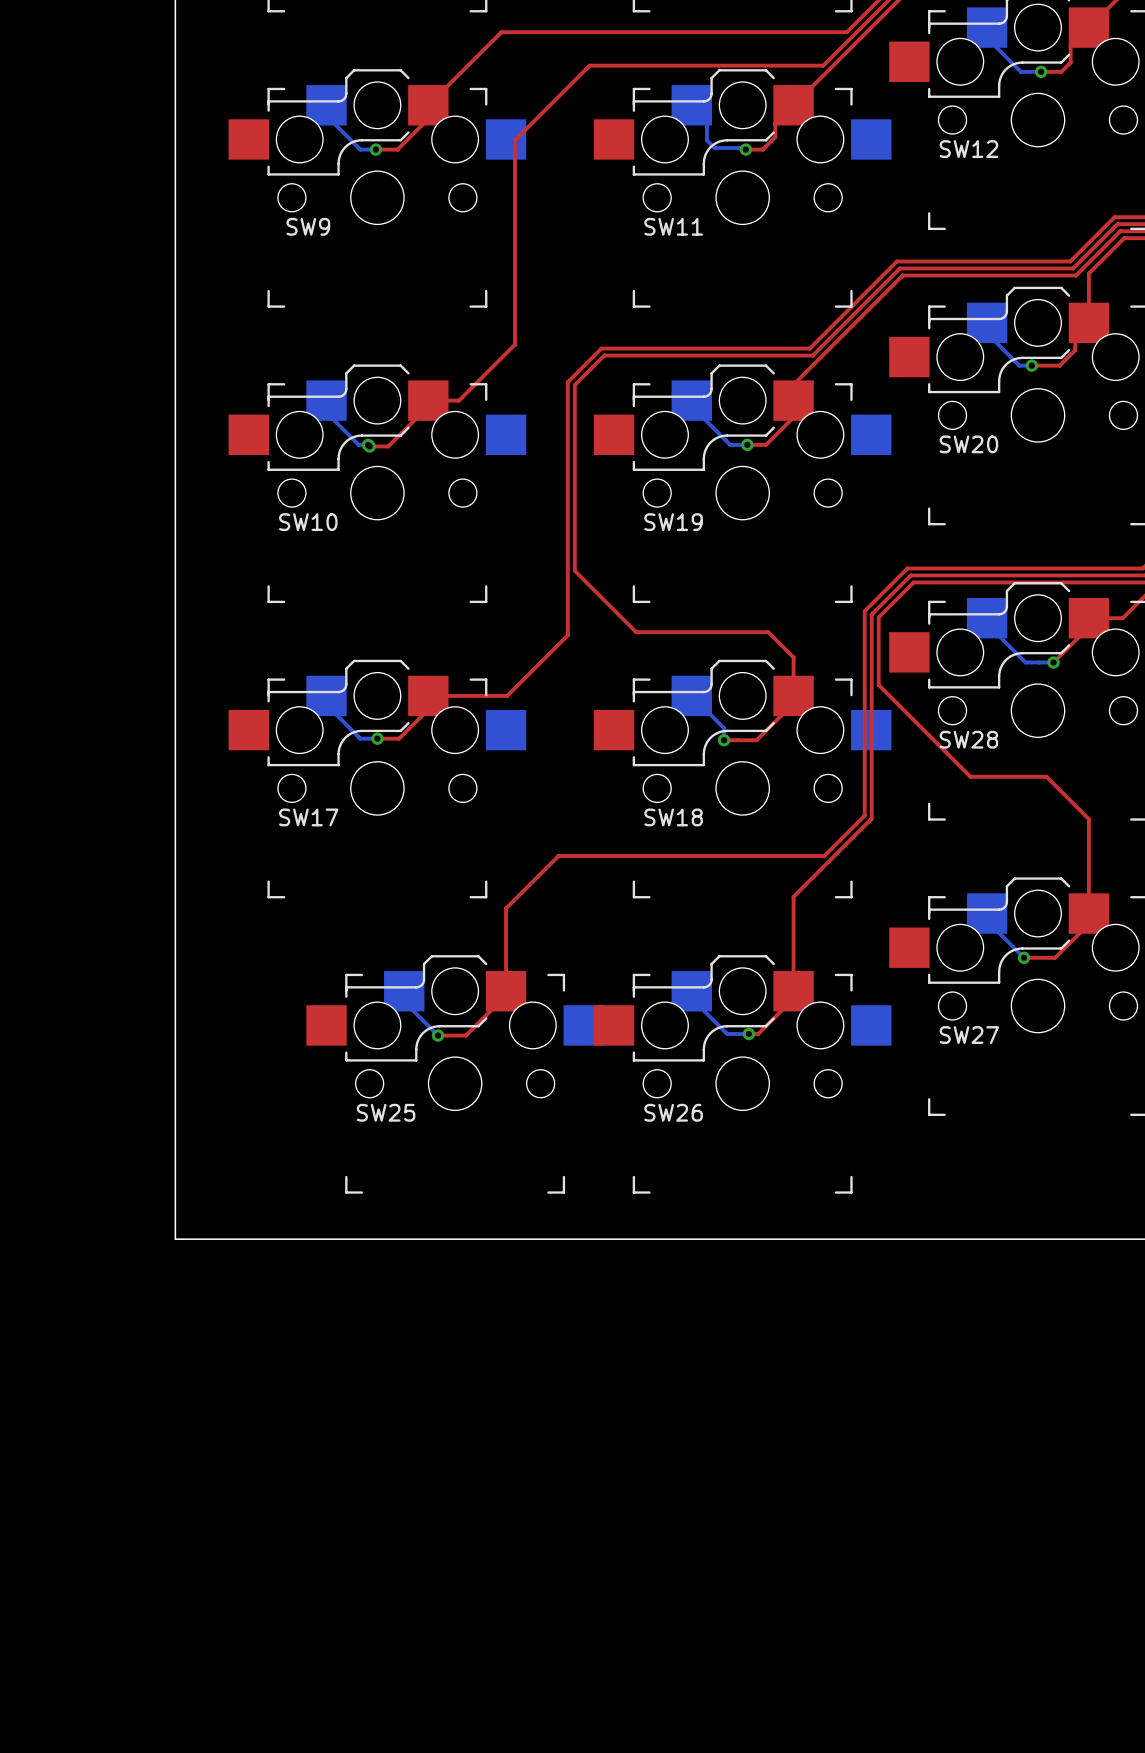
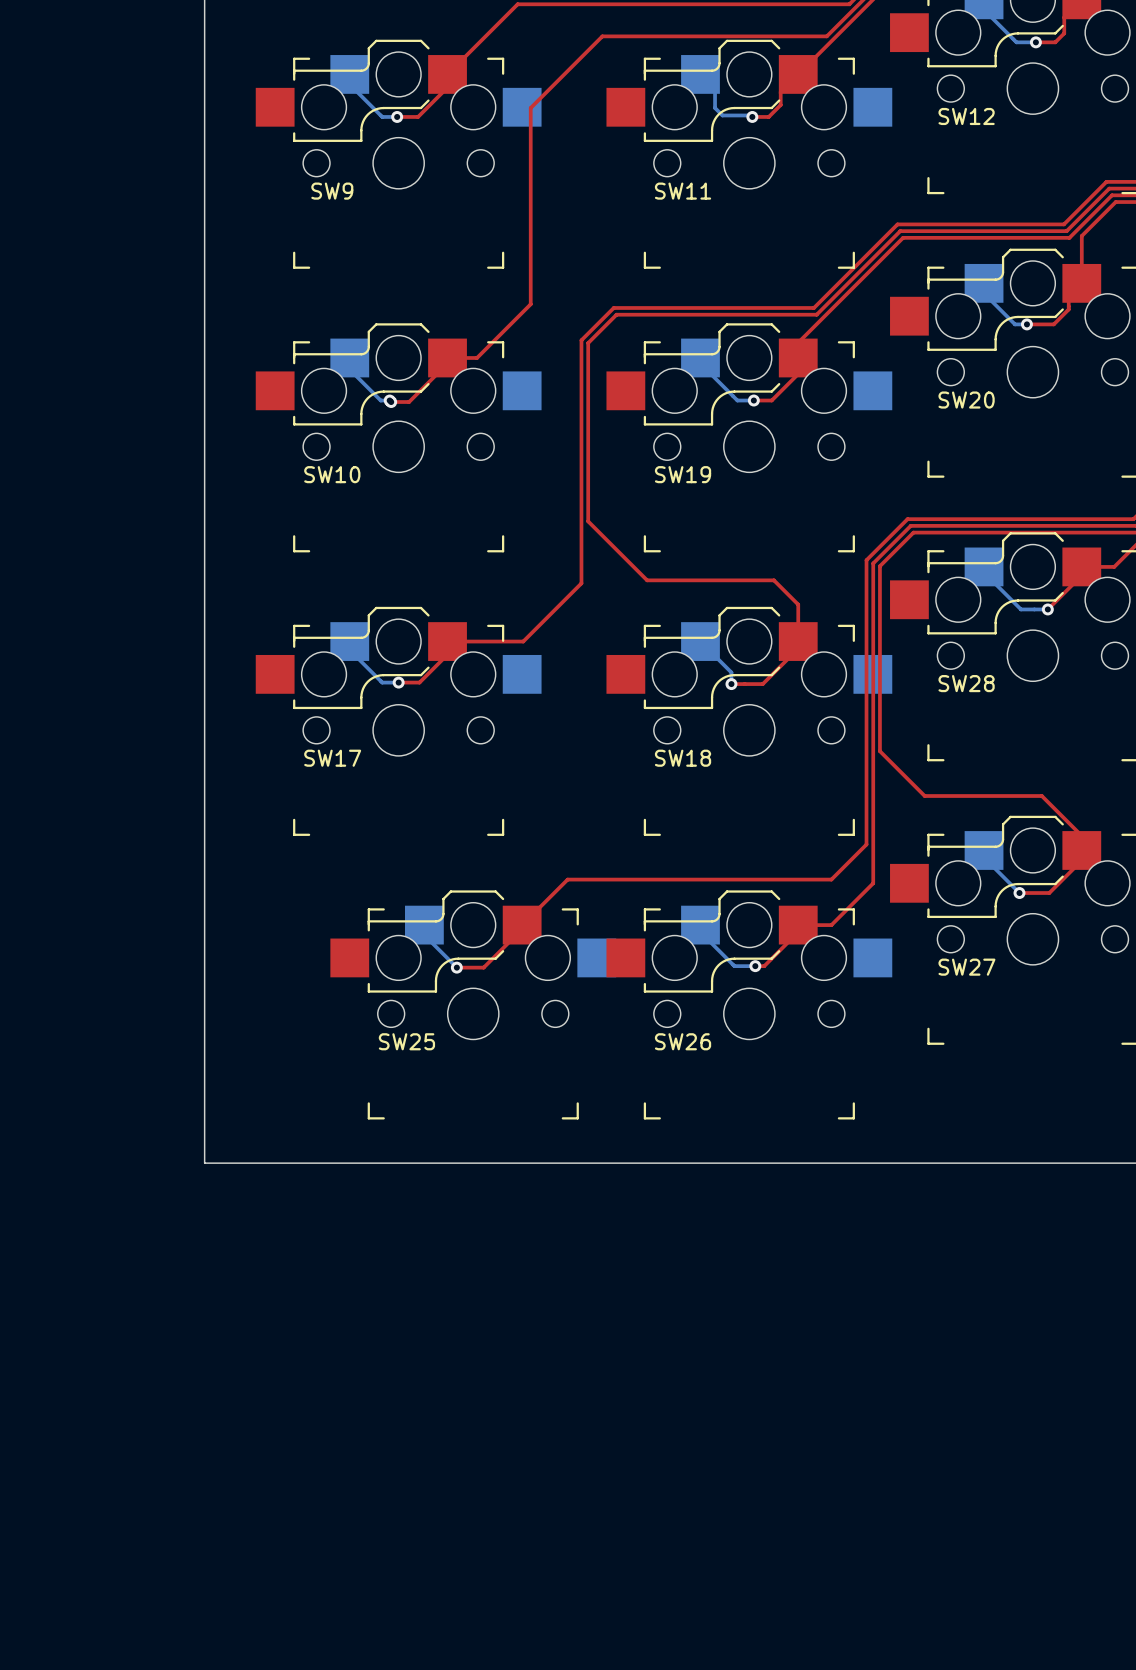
top track: (878, 685) (970, 776) (1046, 776) (1088, 819) (1088, 898) -> (879, 631) (879, 751) (924, 796) (1041, 796) (1081, 835)
top track: (864, 815) (824, 856) (558, 856) (506, 908) (506, 991) -> (866, 756) (866, 844) (831, 879) (567, 879) (522, 925)
top track: (871, 818) (793, 896) (793, 991) -> (873, 759) (873, 883) (831, 925) (798, 925)

